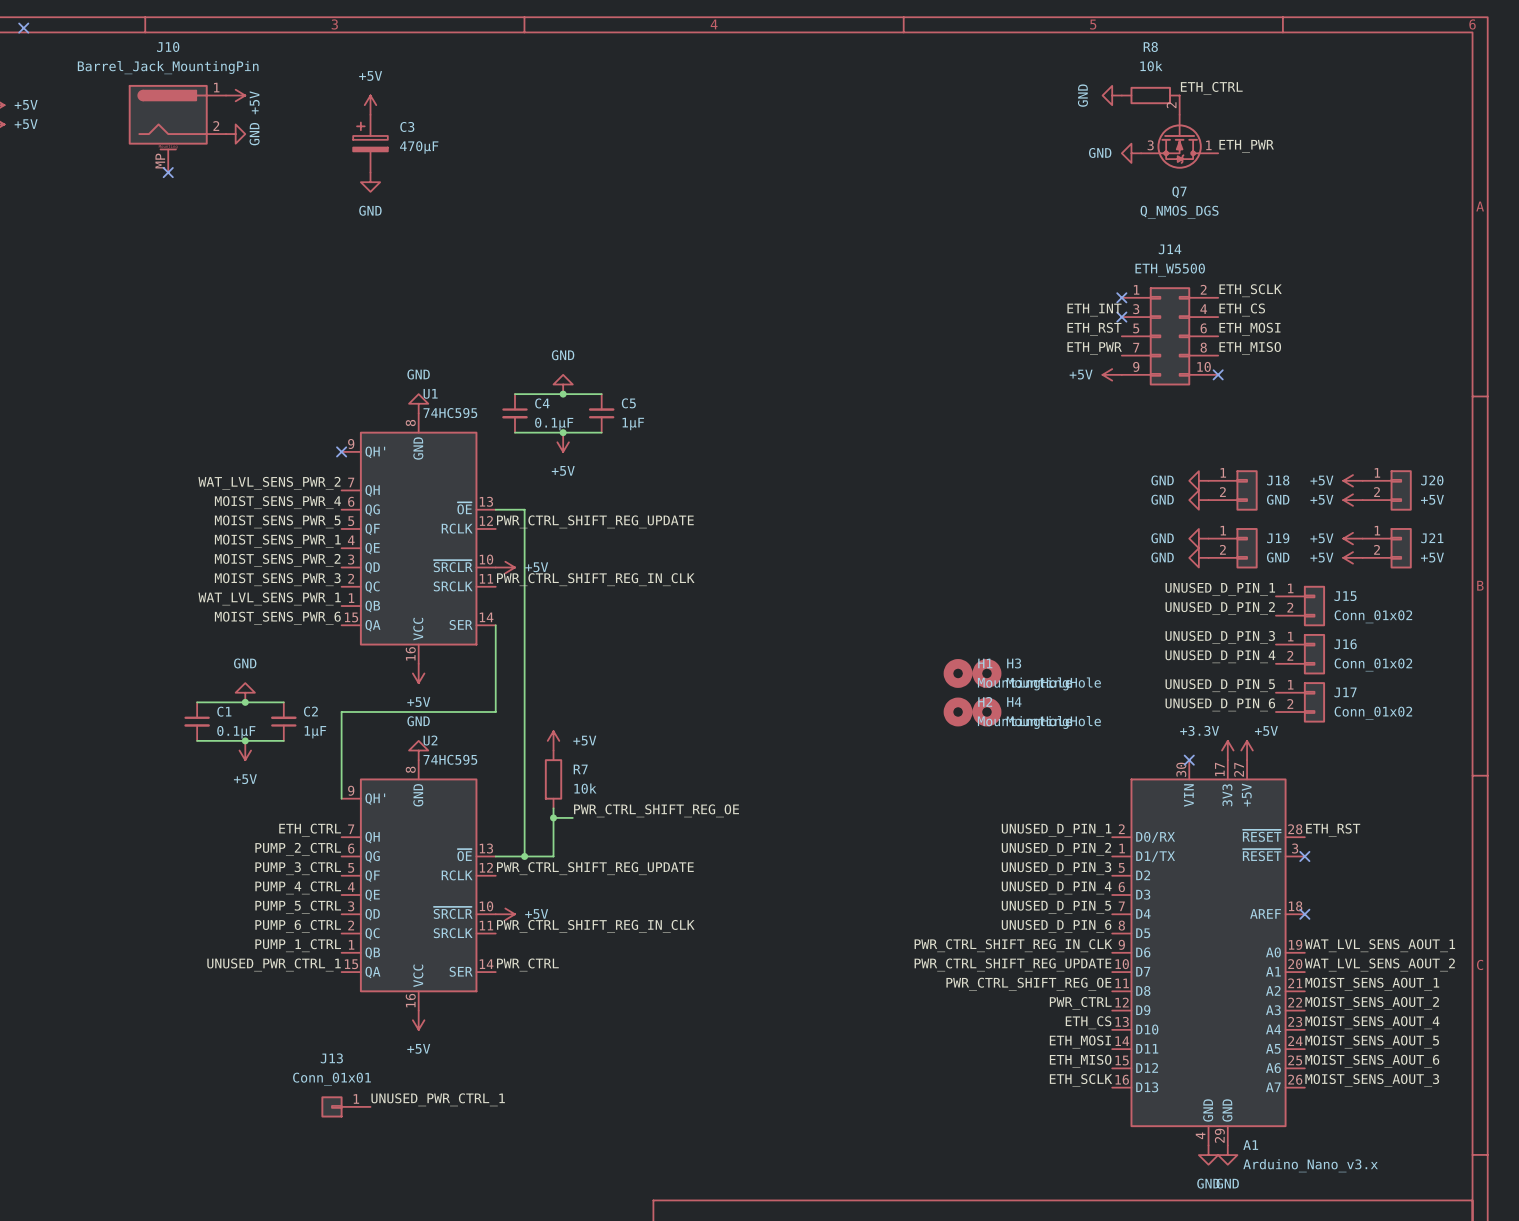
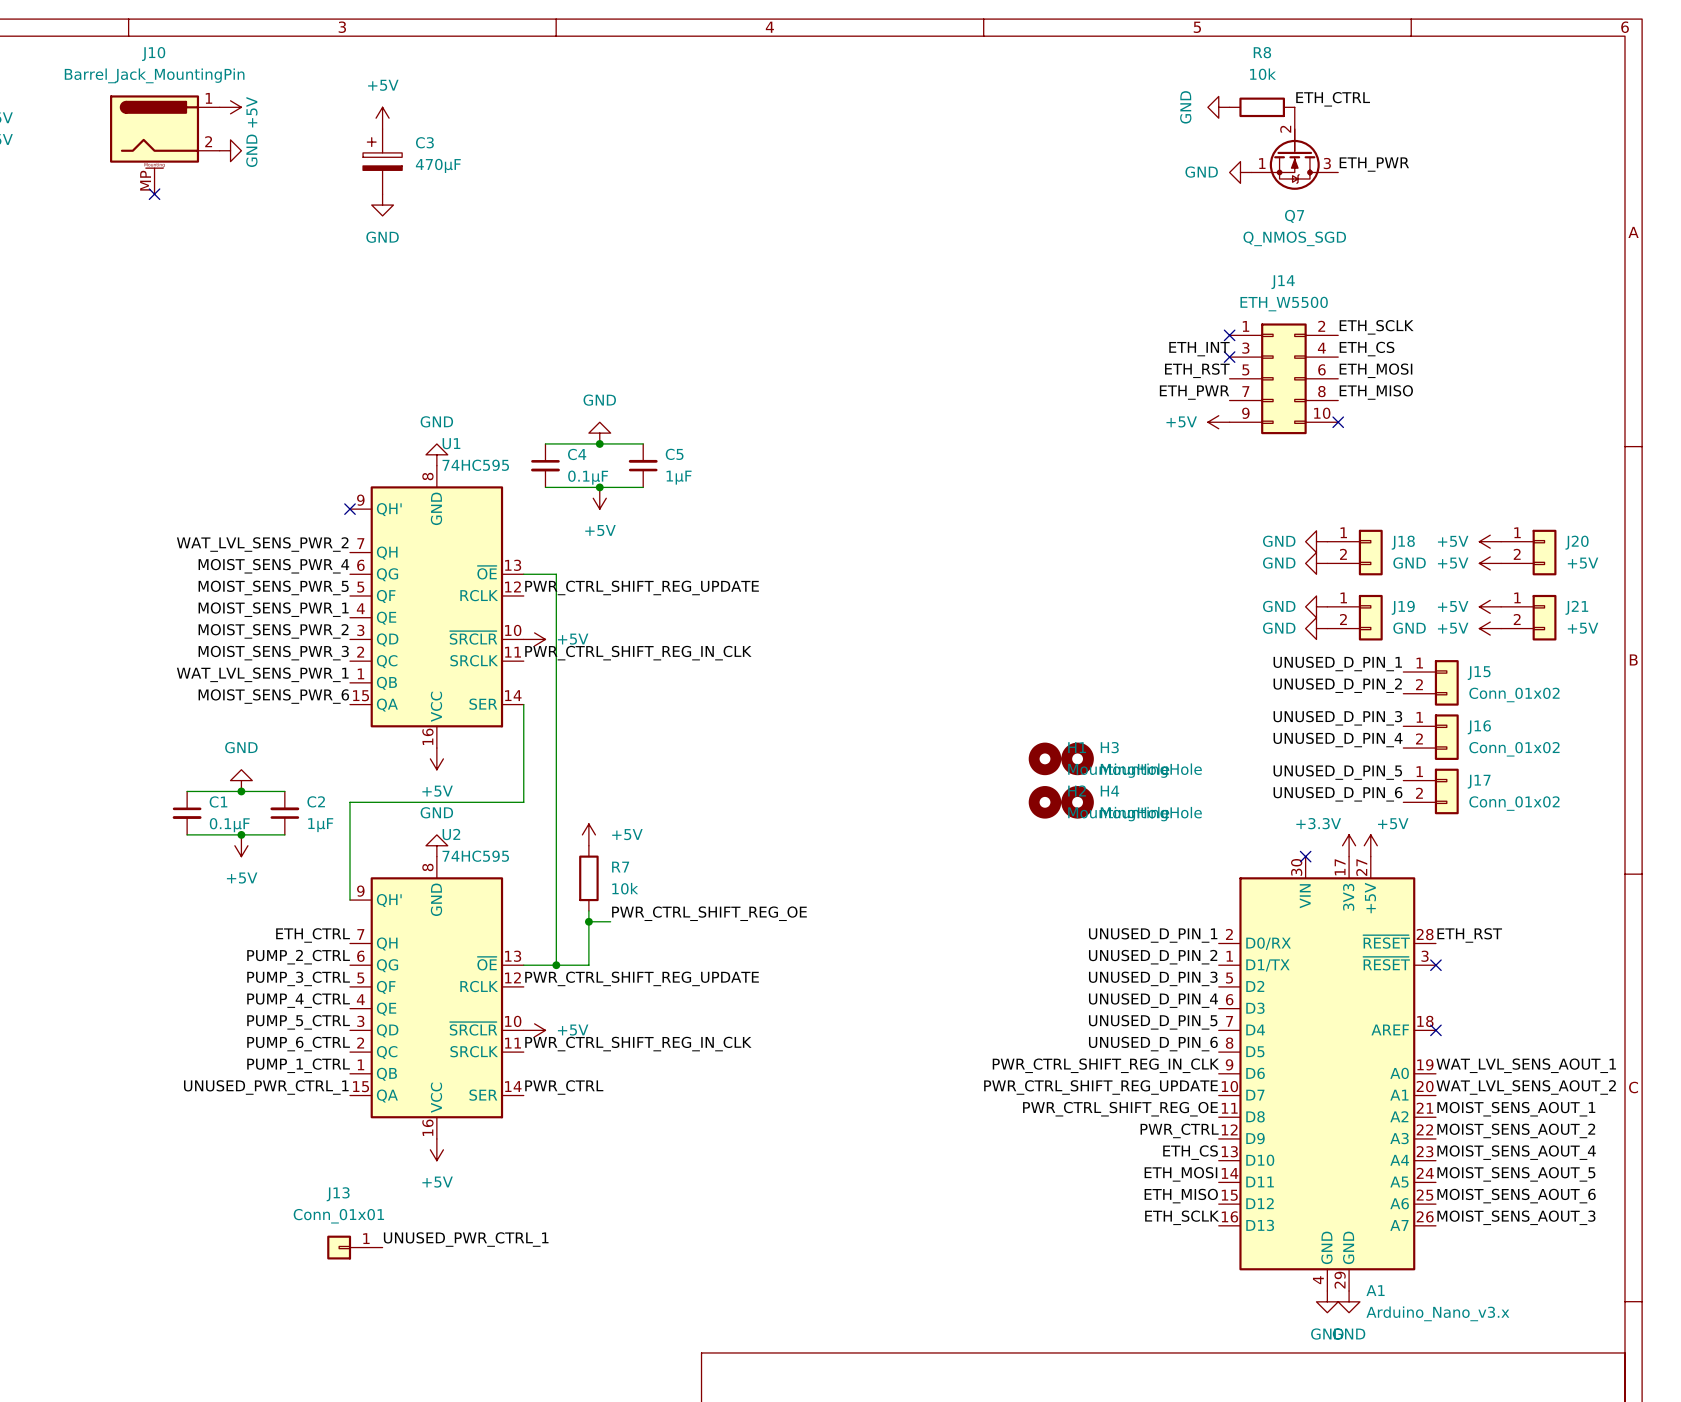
Q7 symbol: [1141, 95, 1219, 169] -> [1251, 107, 1339, 190]
Q7 value: Q_NMOS_DGS (1179, 212) -> Q_NMOS_SGD (1294, 238)

